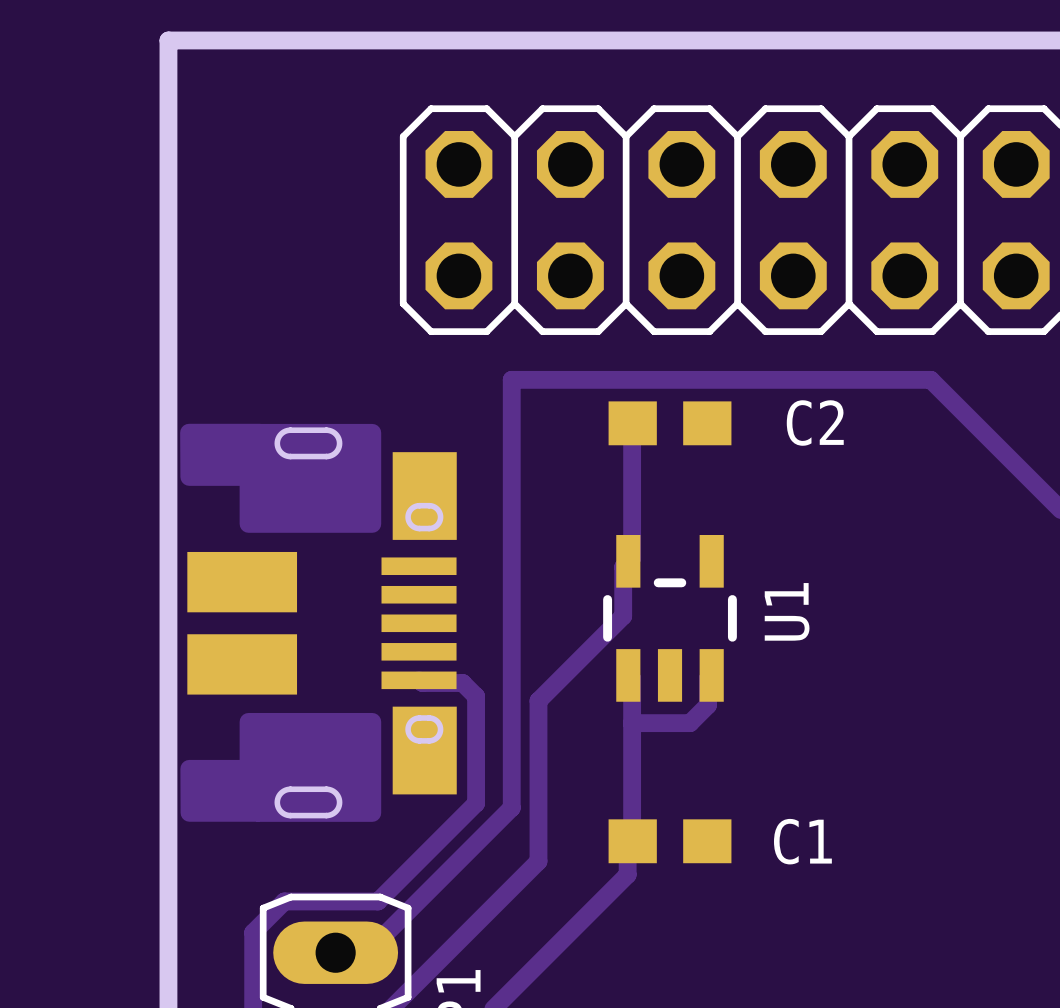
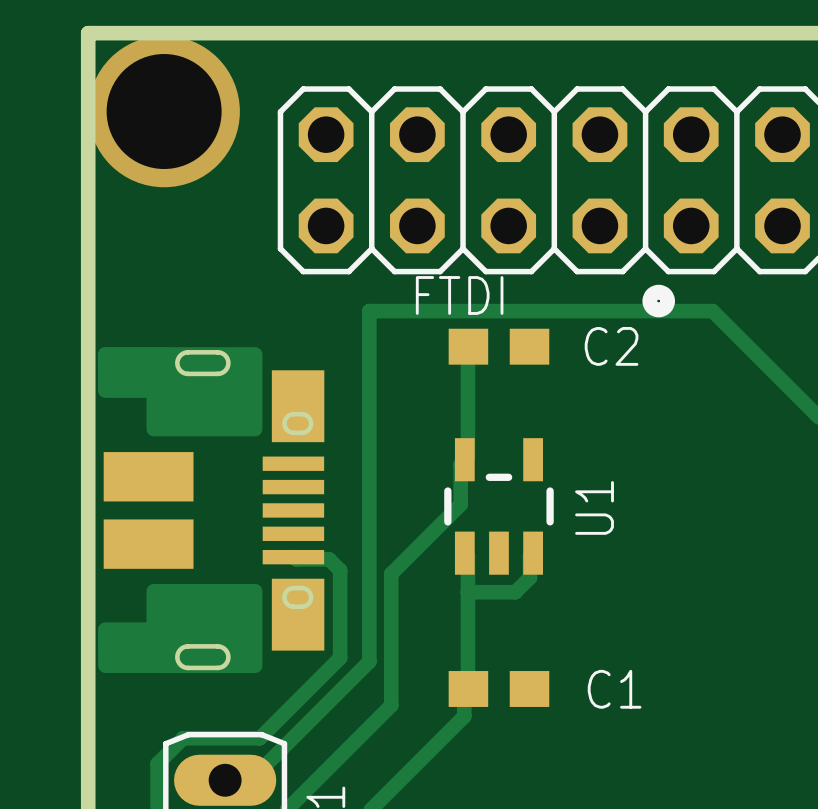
via: none -> (164, 111)
drawing: none -> [642, 284, 675, 318]
text: none -> FTDI (459, 295)

